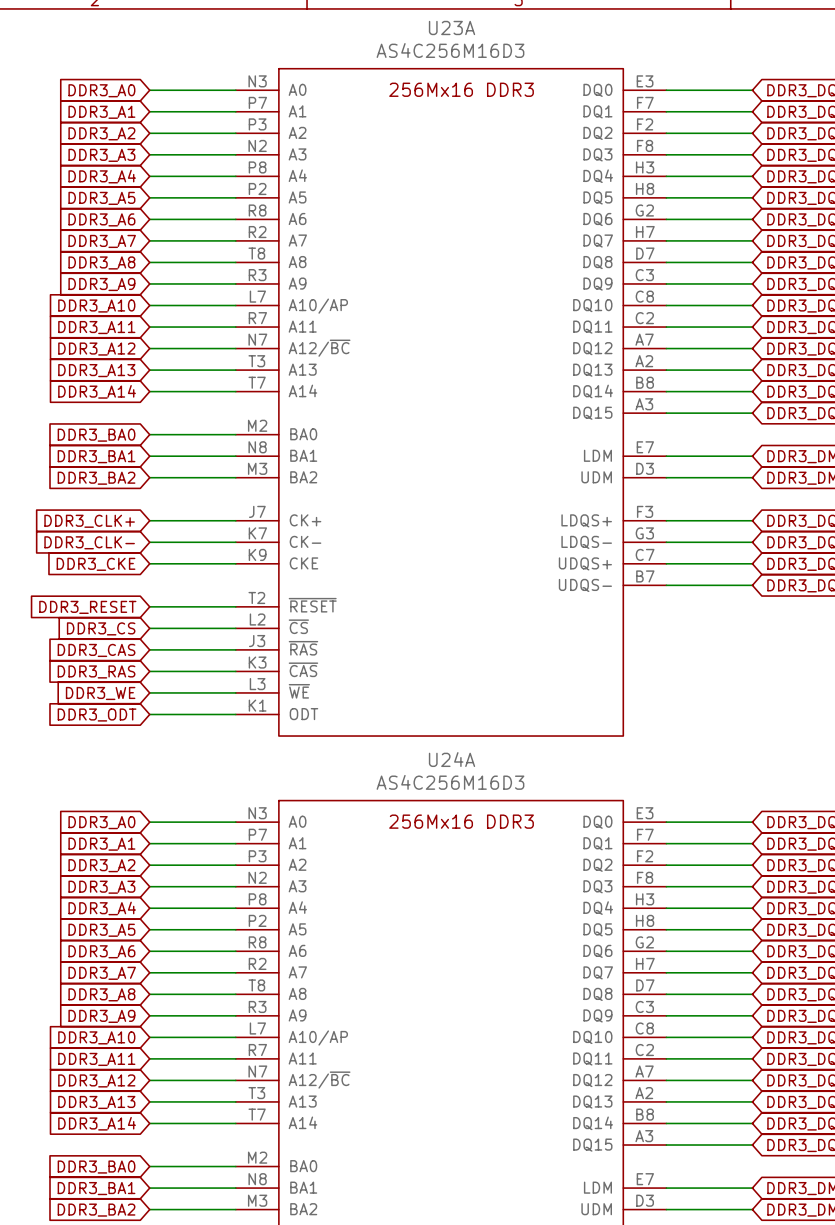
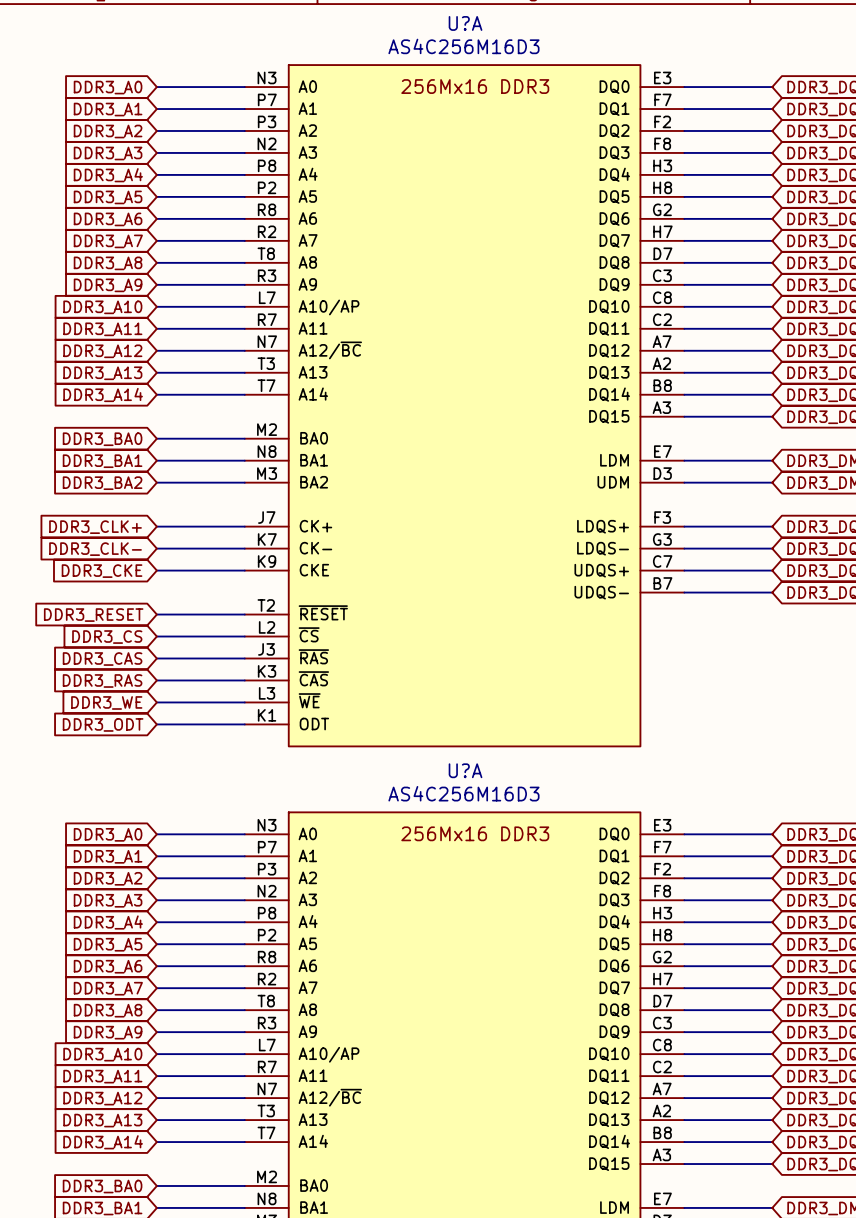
U23A name: U23A (452, 27) -> U?A (465, 23)
U24A name: U24A (452, 759) -> U?A (465, 770)

